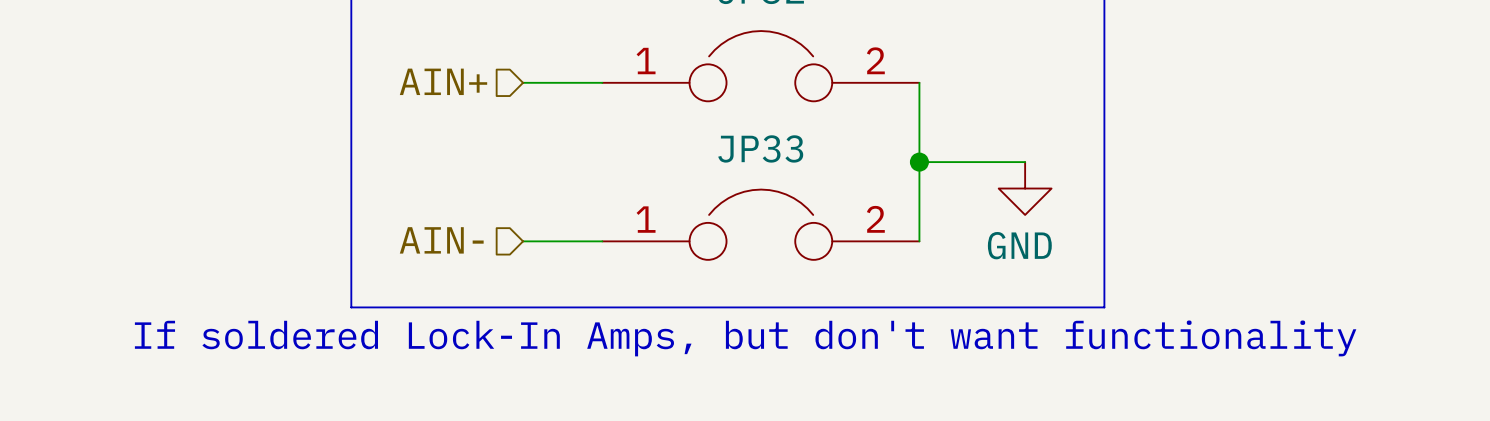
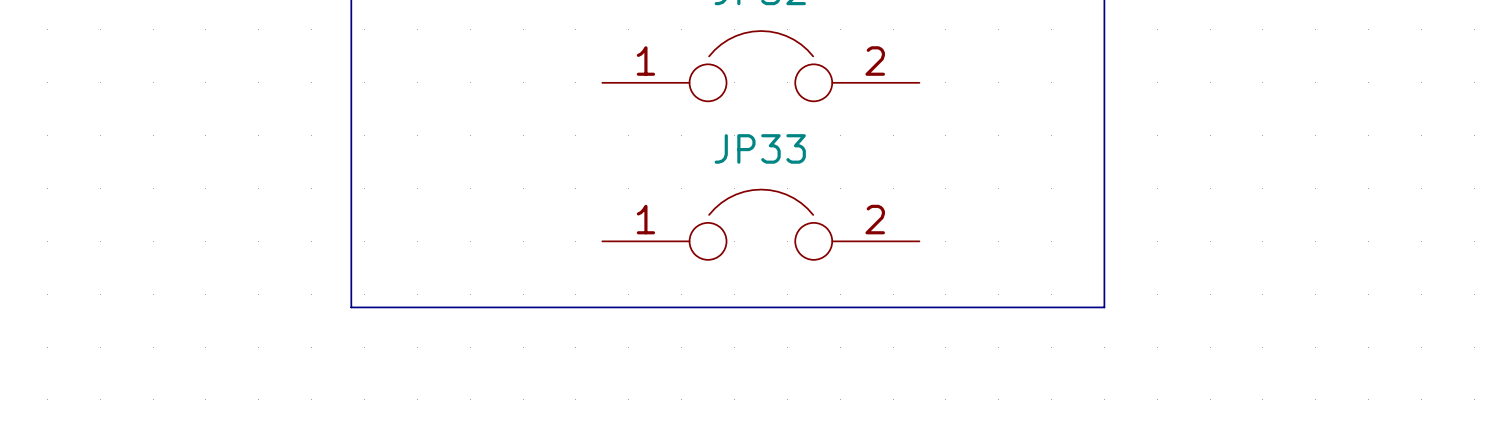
hierarchical label: AIN+ (443, 81) -> none
wire: (523, 82) (602, 82) -> none
wire: (919, 82) (919, 241) -> none
wire: (919, 162) (1025, 162) -> none
junction: (919, 162) -> none
power symbol: GND (1025, 188) -> none
hierarchical label: AIN- (441, 240) -> none
wire: (523, 241) (602, 241) -> none
text: If soldered Lock-In Amps, but don't want functionality (745, 338) -> none

